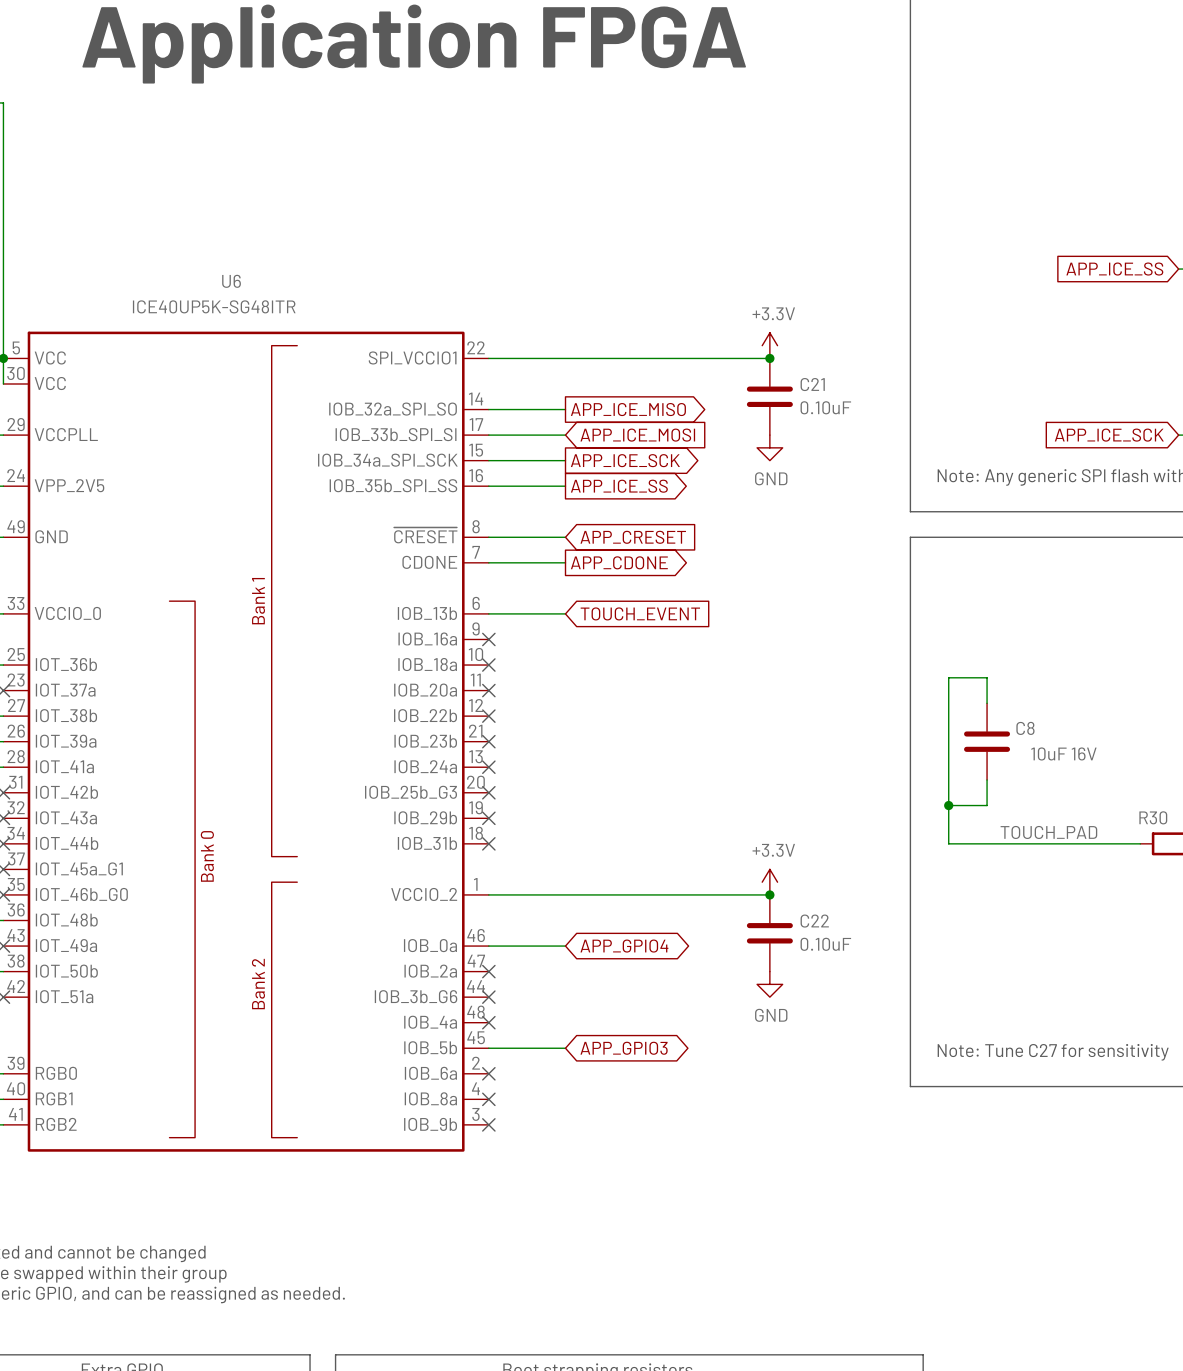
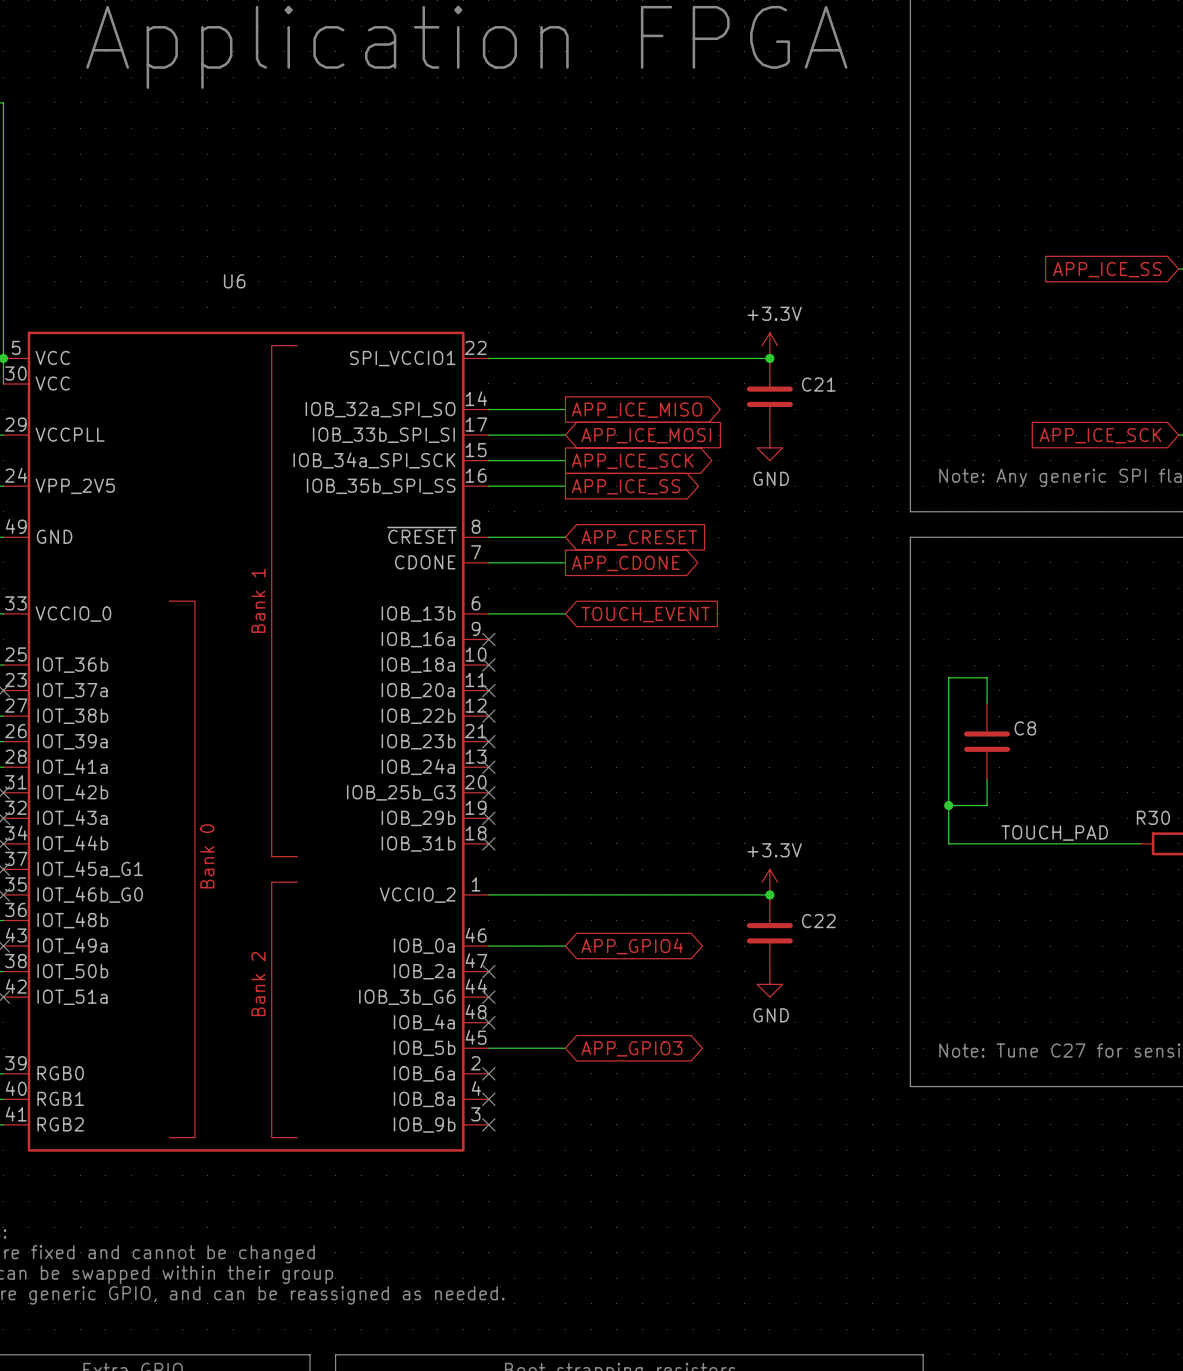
U6 value: ICE40UP5K-SG48ITR (214, 306) -> none
C21 value: 0.10uF (825, 407) -> none
C8 value: 10uF 16V (1063, 753) -> none
C22 value: 0.10uF (825, 944) -> none

